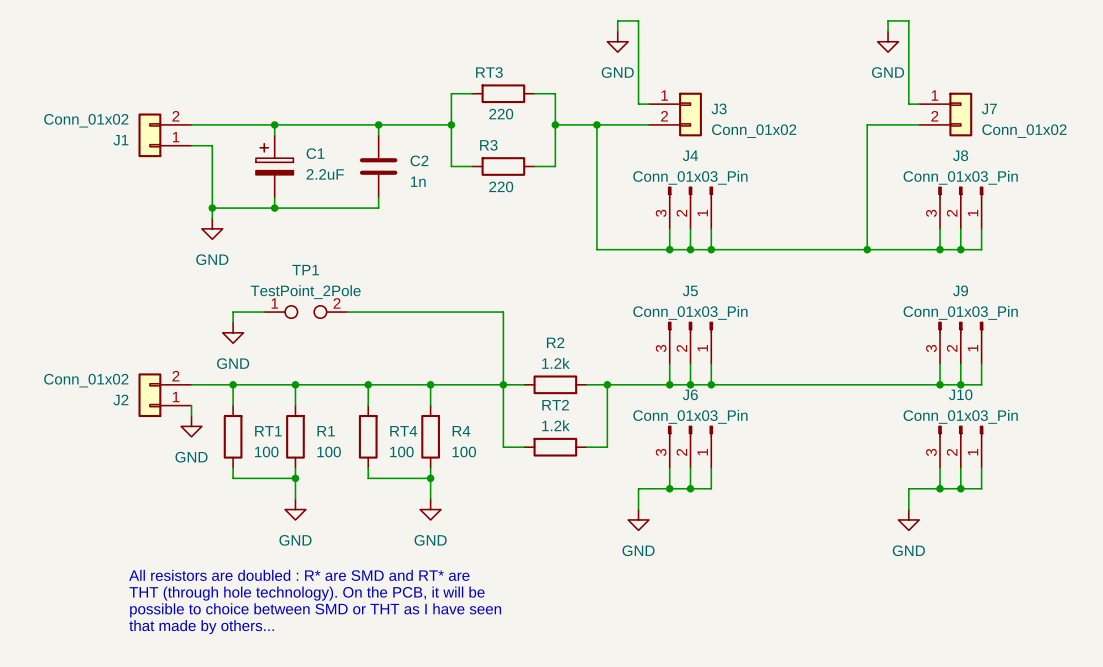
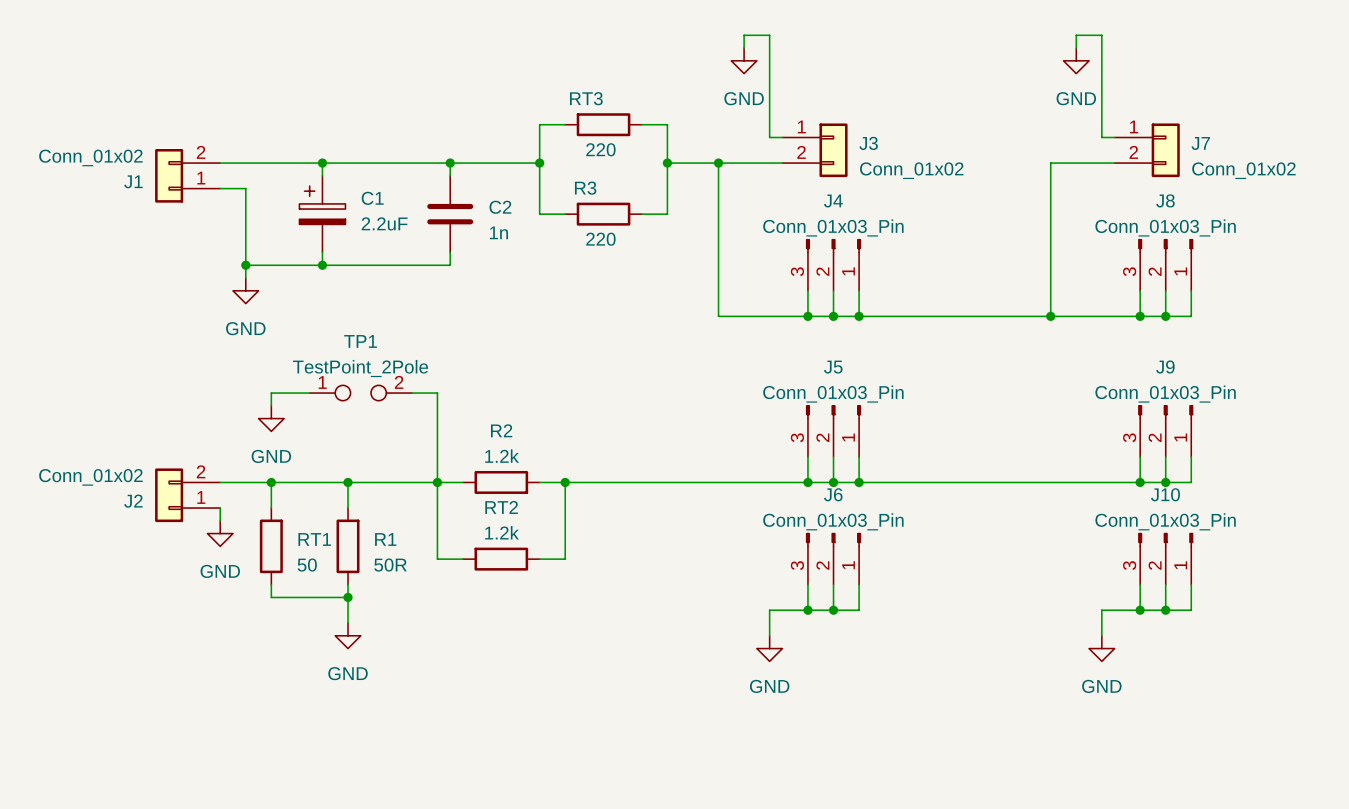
wire: (368, 312) (503, 312) (503, 447) (524, 447) -> (437, 393) (437, 482)
wire: (389, 384) (451, 384) -> (629, 482) (705, 482)
wire: (430, 384) (430, 405) -> none
junction: (430, 384) -> none
junction: none -> (565, 482)
junction: (503, 384) -> none
R2 position: (555, 384) -> (501, 482)
wire: (607, 384) (607, 447) (586, 447) -> (565, 482) (565, 559) (539, 559)
junction: (607, 384) -> none
wire: none -> (437, 508) (437, 559) (463, 559)
RT4: 100 (368, 436) -> none
R4: 100 (430, 436) -> none
RT2 position: (555, 447) -> (501, 559)
RT1 value: 100 (266, 451) -> 50 (307, 565)
R1 value: 100 (329, 451) -> 50R (390, 565)
wire: (368, 467) (368, 478) (430, 478) -> none
wire: (430, 467) (430, 499) -> none
junction: (430, 478) -> none
power symbol: GND (430, 509) -> none
text: All resistors are doubled : R* are SMD and RT* are (299, 575) -> none
text: THT (through hole technology). On the PCB, it will be (307, 593) -> none
text: possible to choice between SMD or THT as I have seen (315, 610) -> none
text: that made by others... (201, 627) -> none

